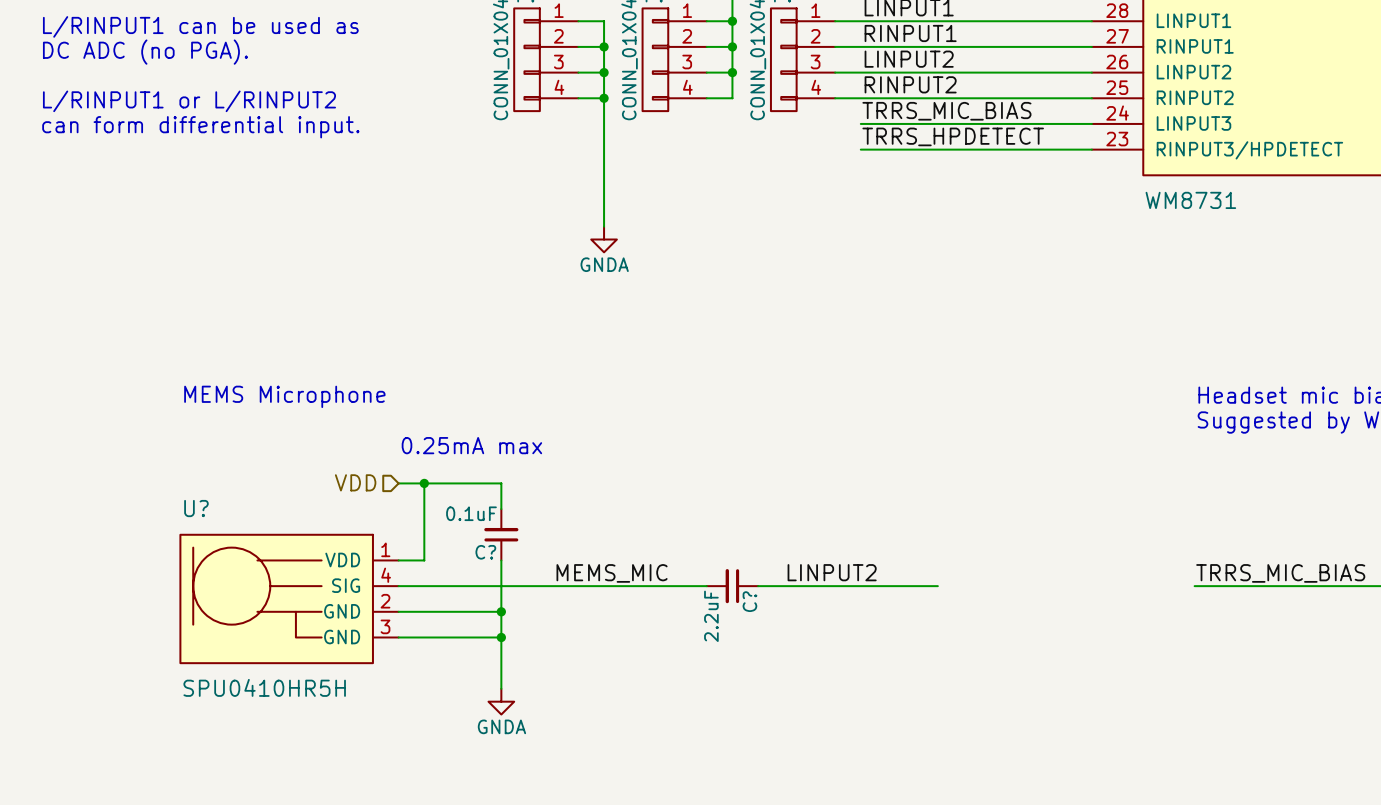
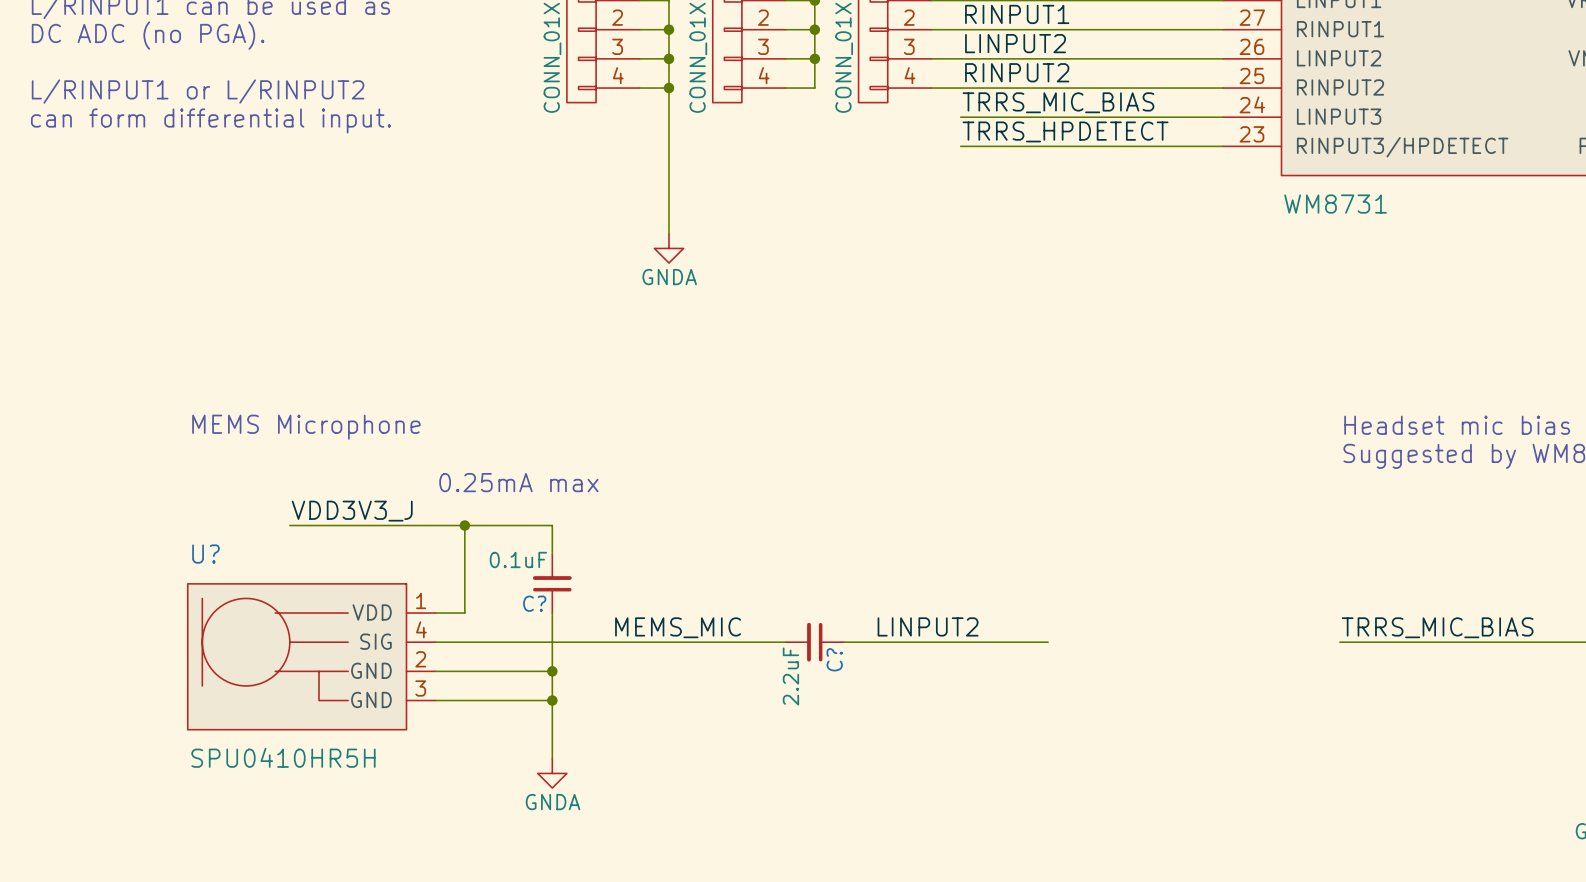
label: none -> VDD3V3_J (352, 511)
hierarchical label: VDD (355, 482) -> none
wire: none -> (289, 525) (435, 525)

